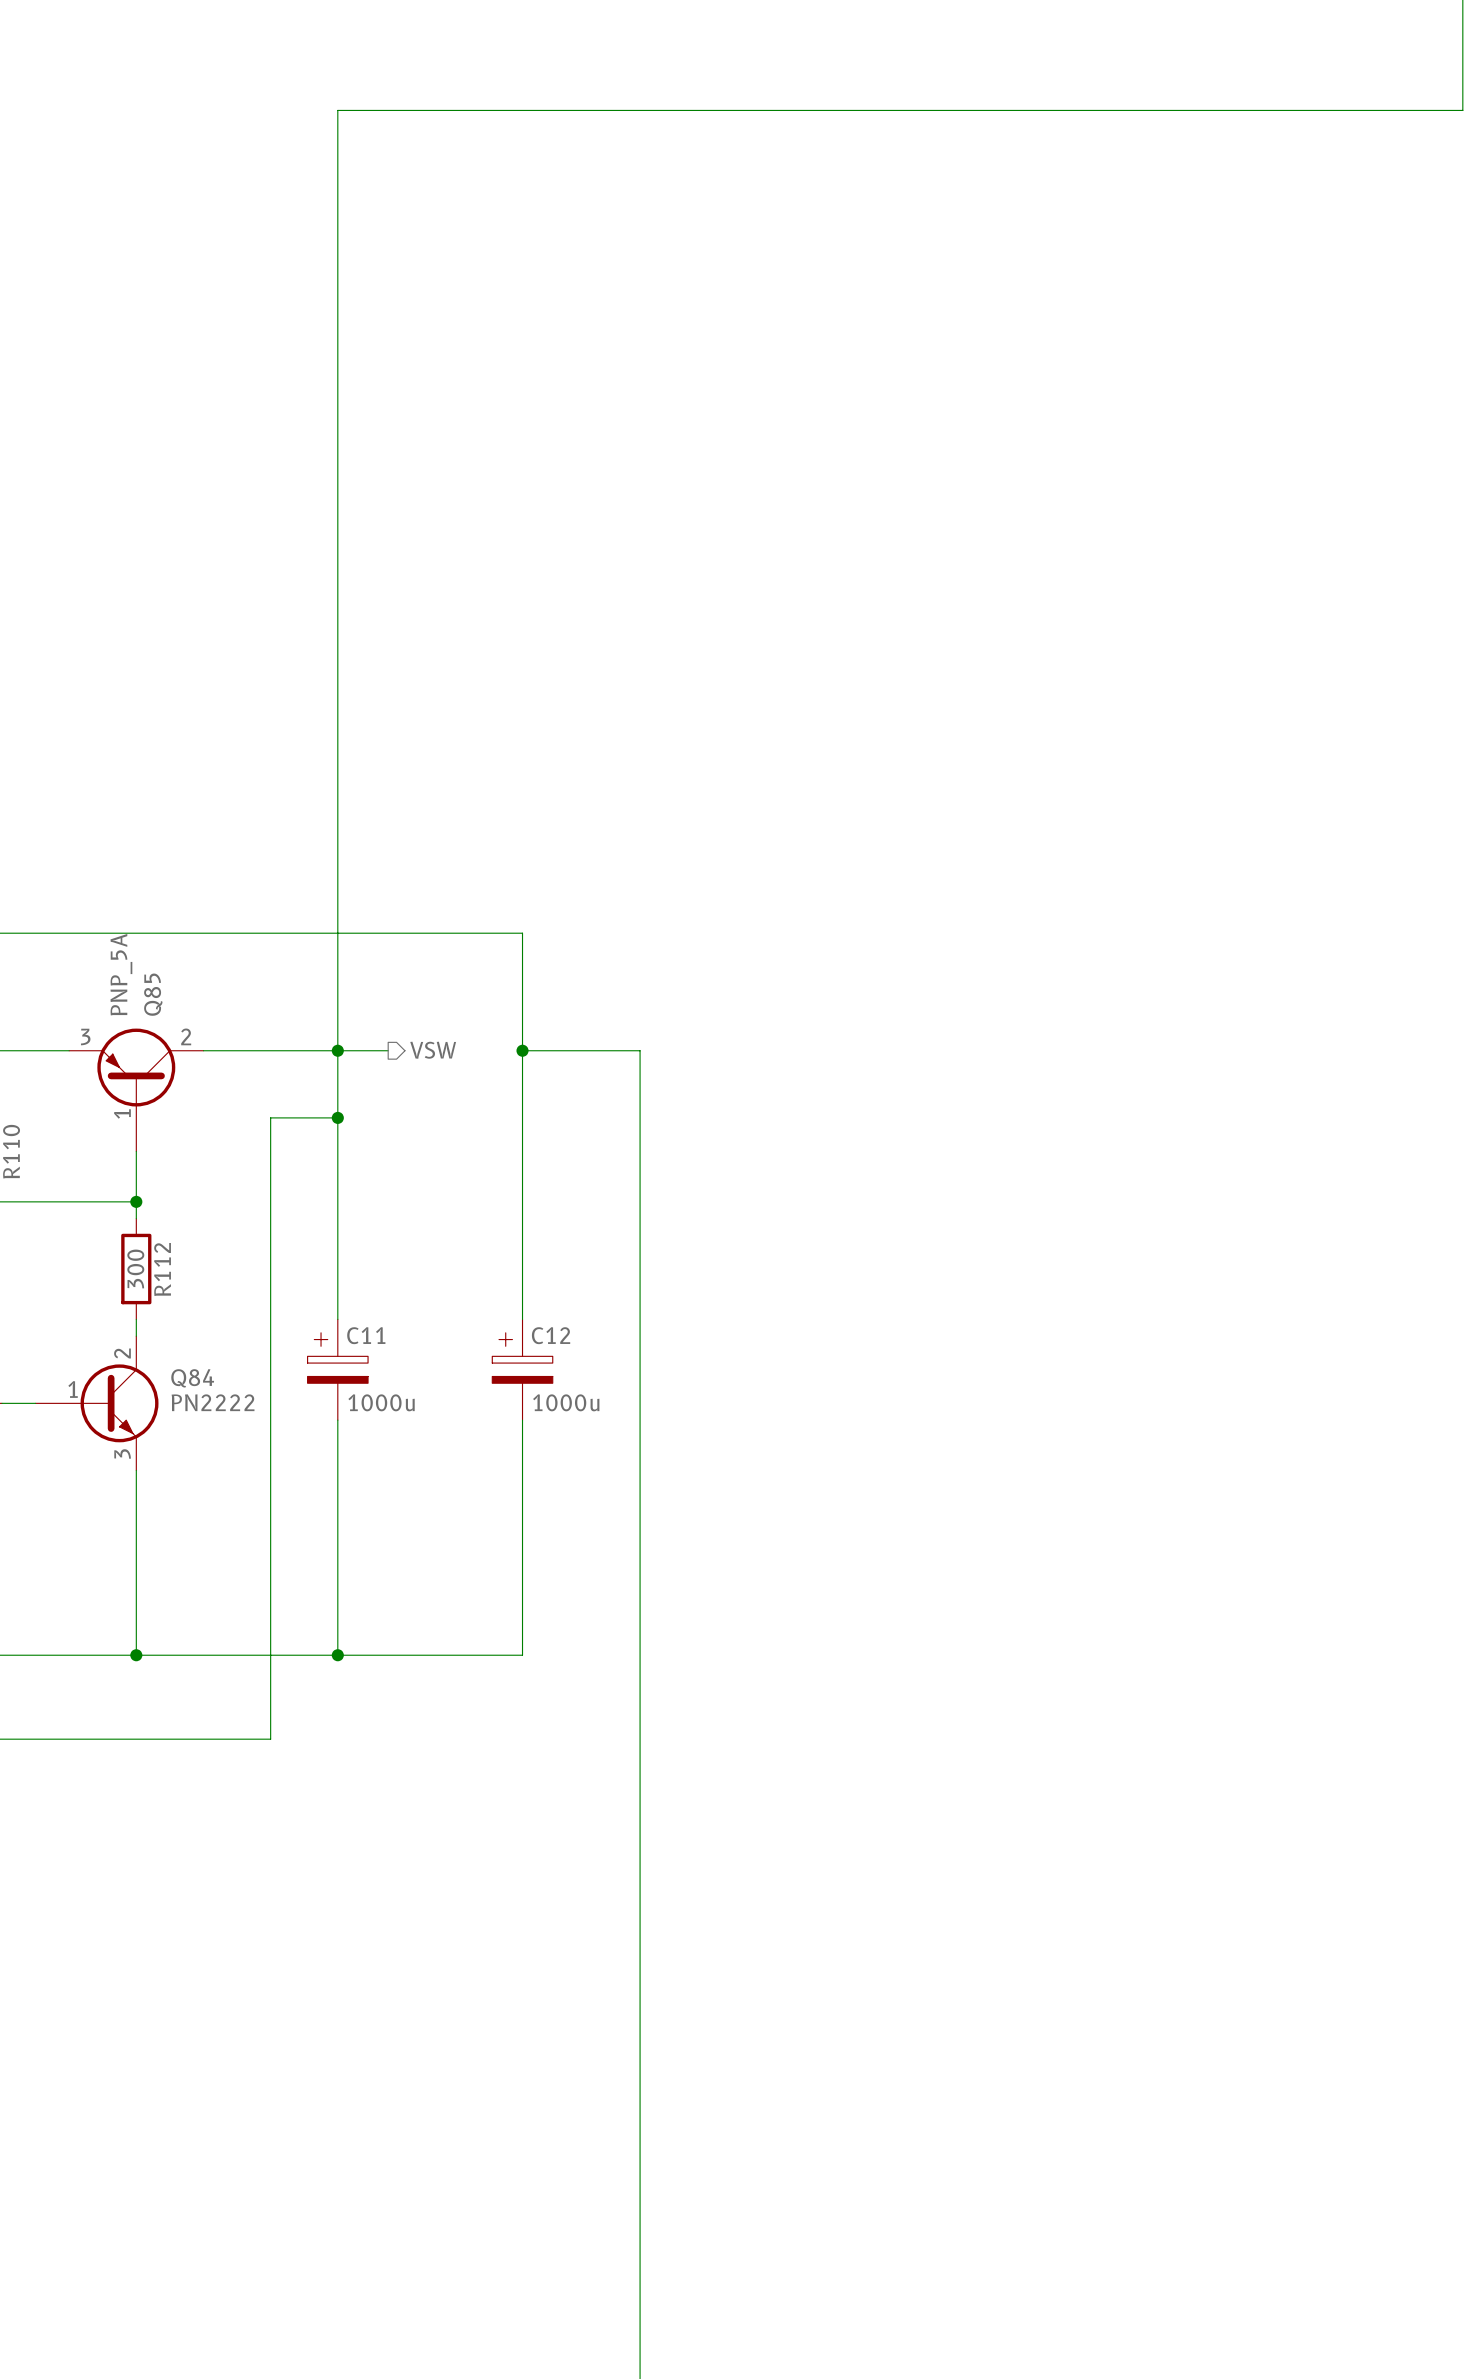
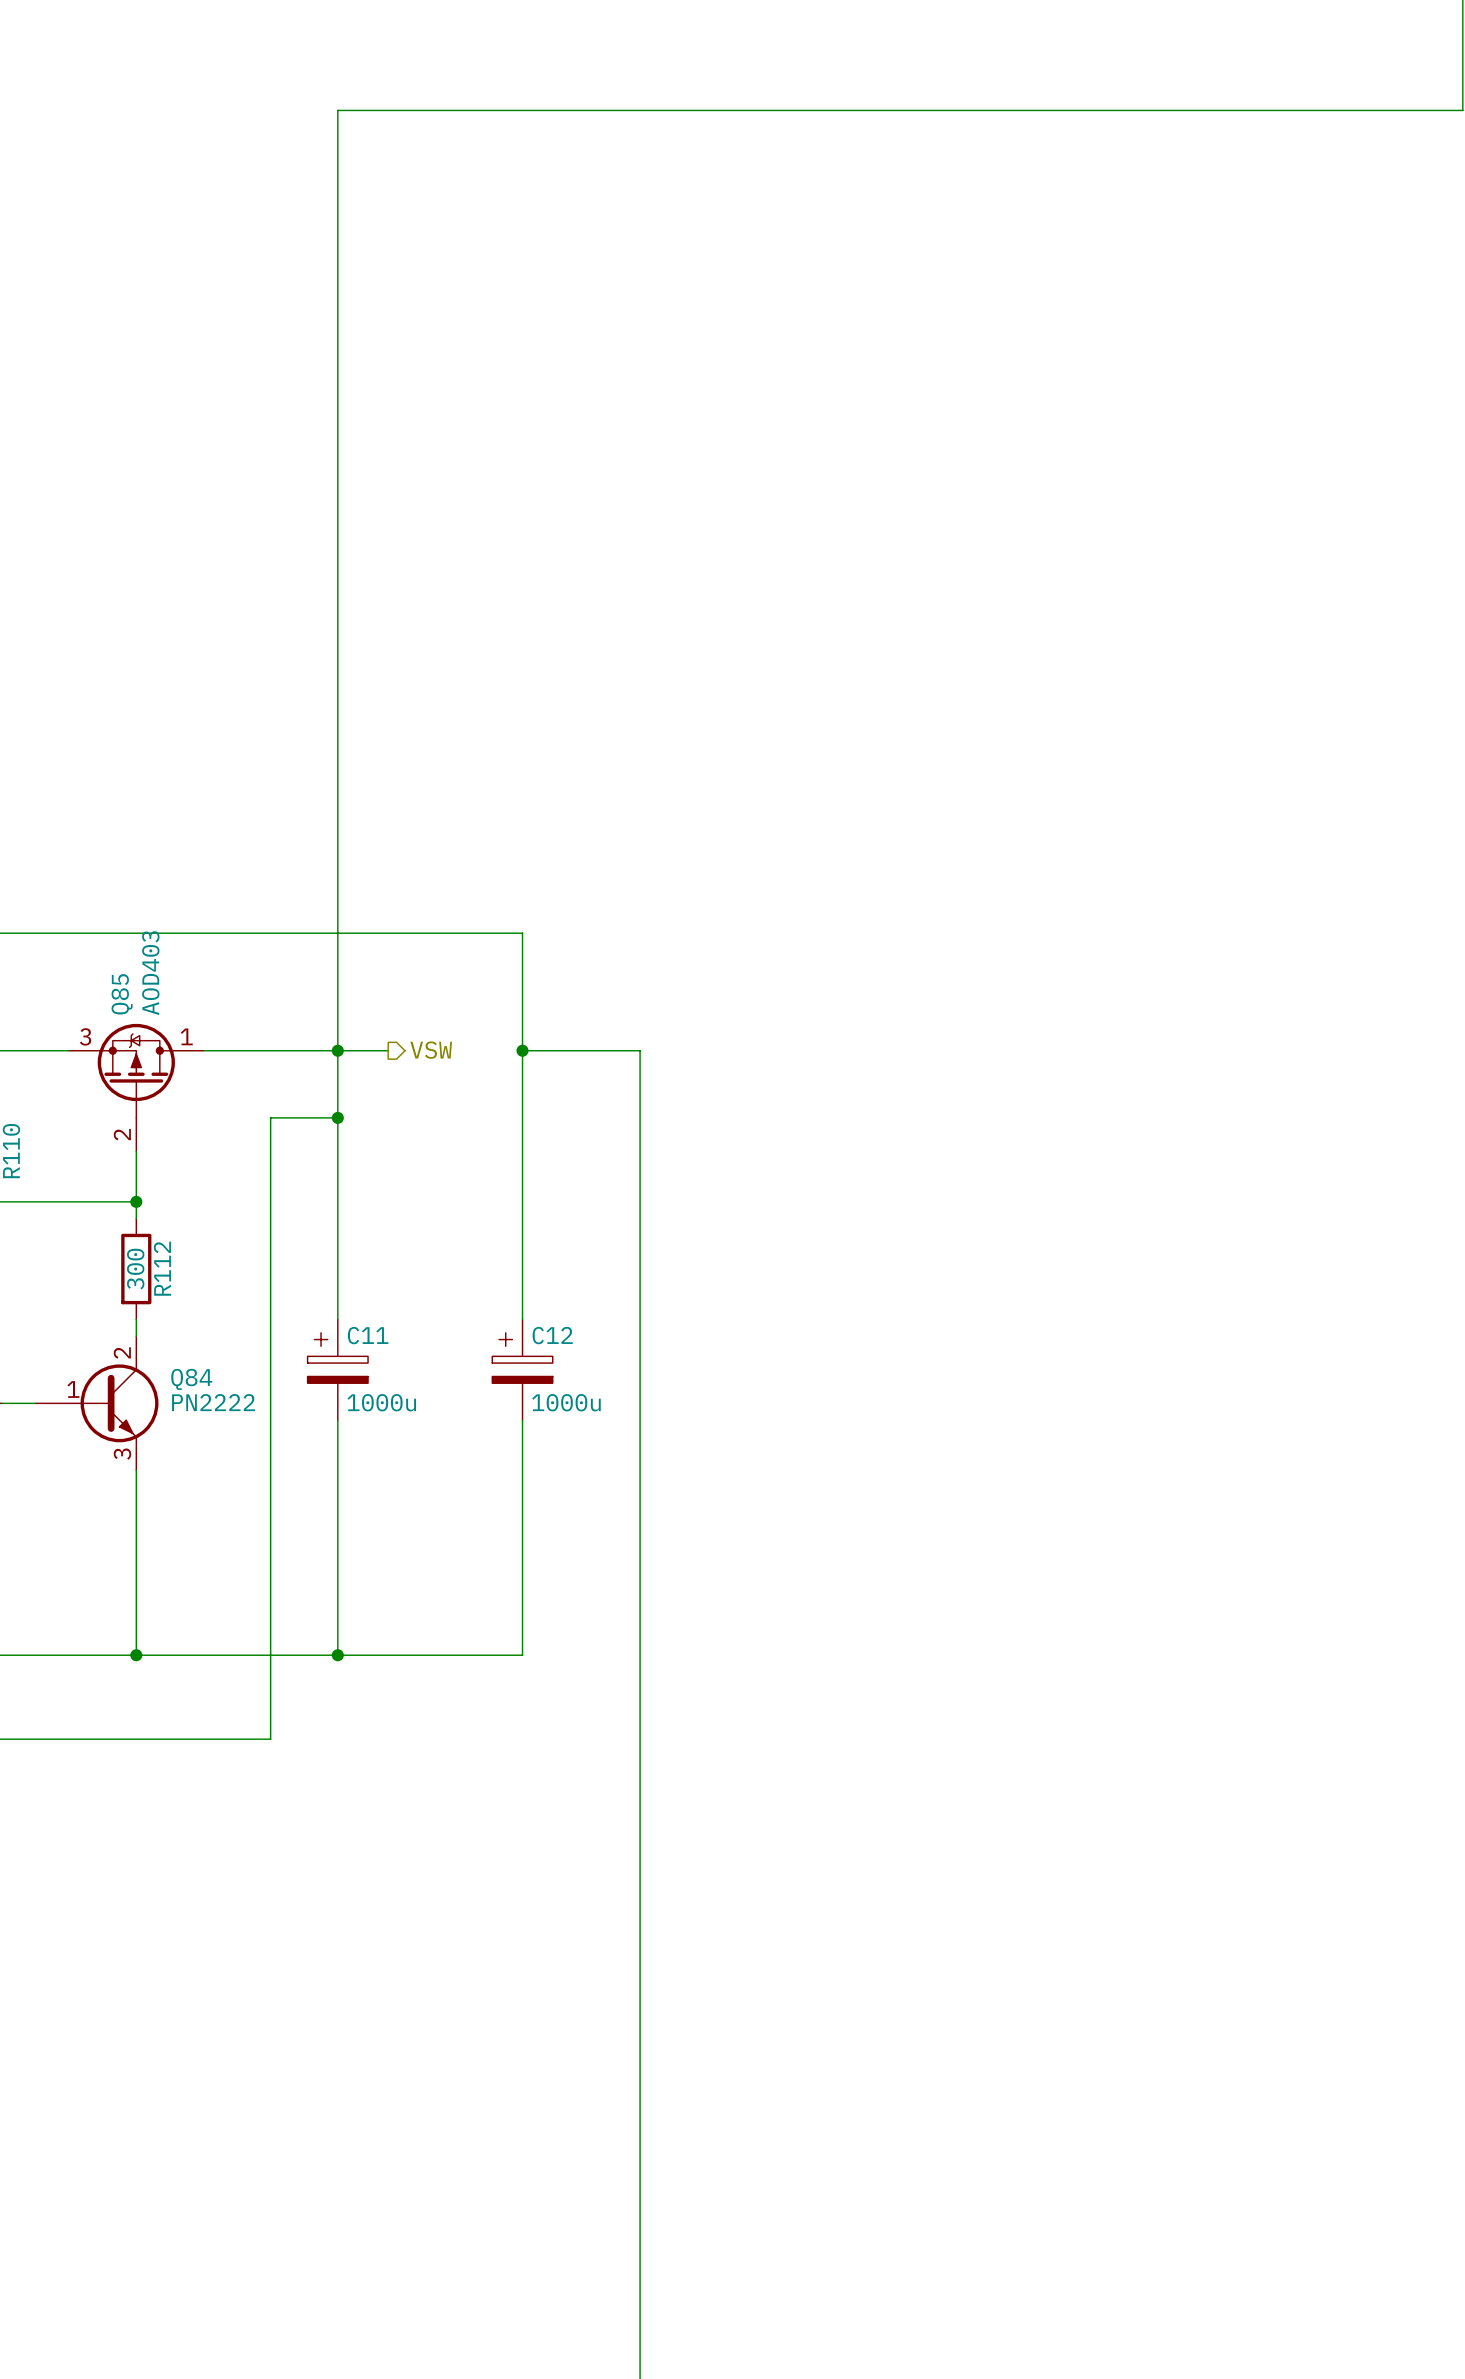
Q85 value: PNP_5A (121, 974) -> AOD403 (150, 973)
Q85 name position: Q85 (153, 994) -> Q85 (122, 994)
Q85 symbol: [69, 1028, 204, 1152] -> [69, 1023, 204, 1152]

